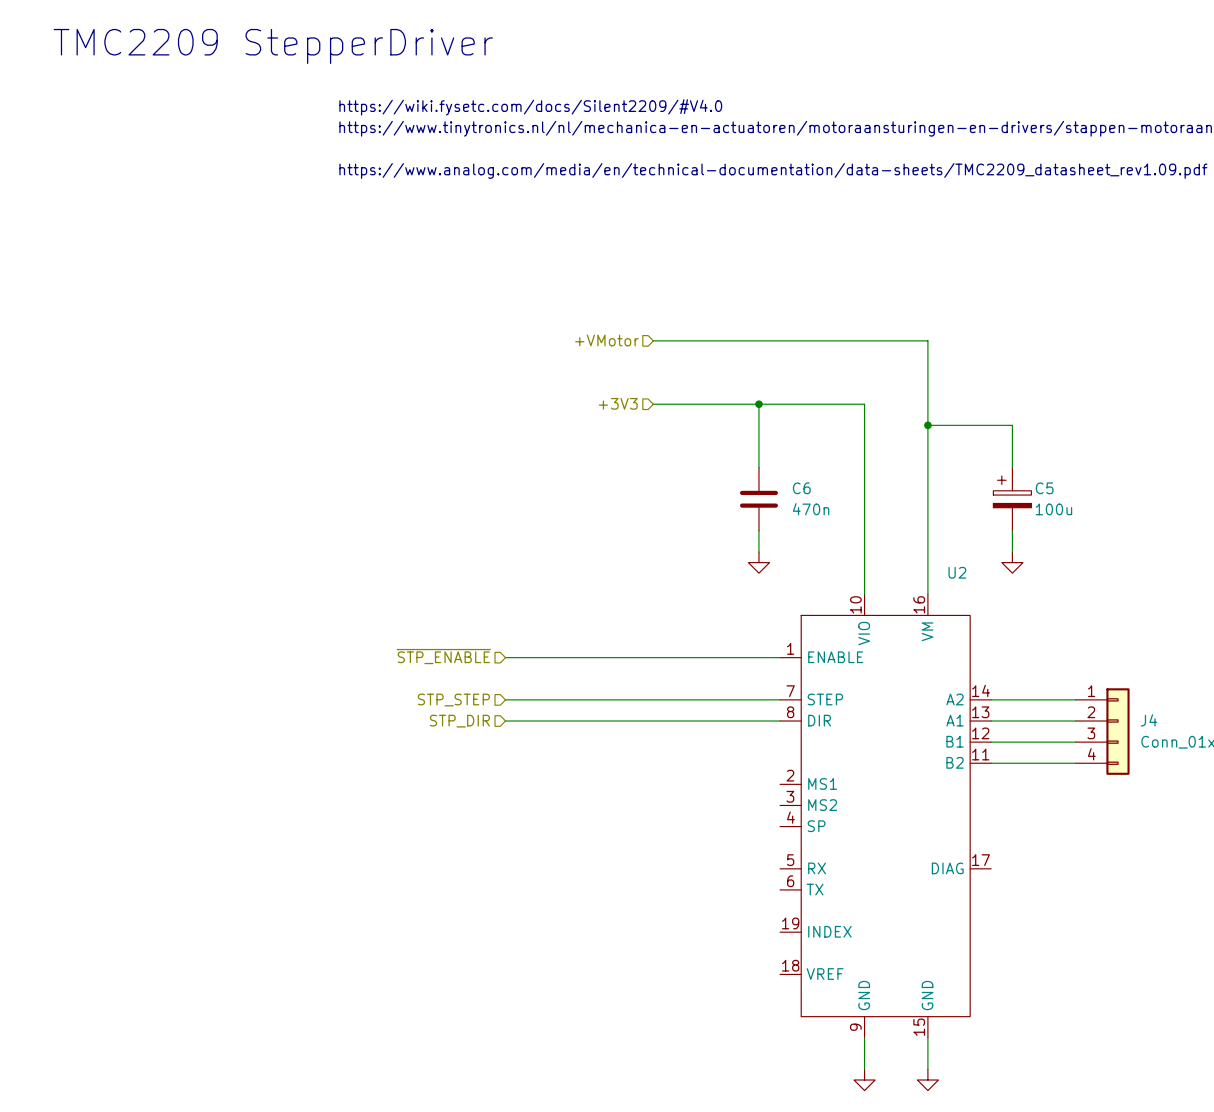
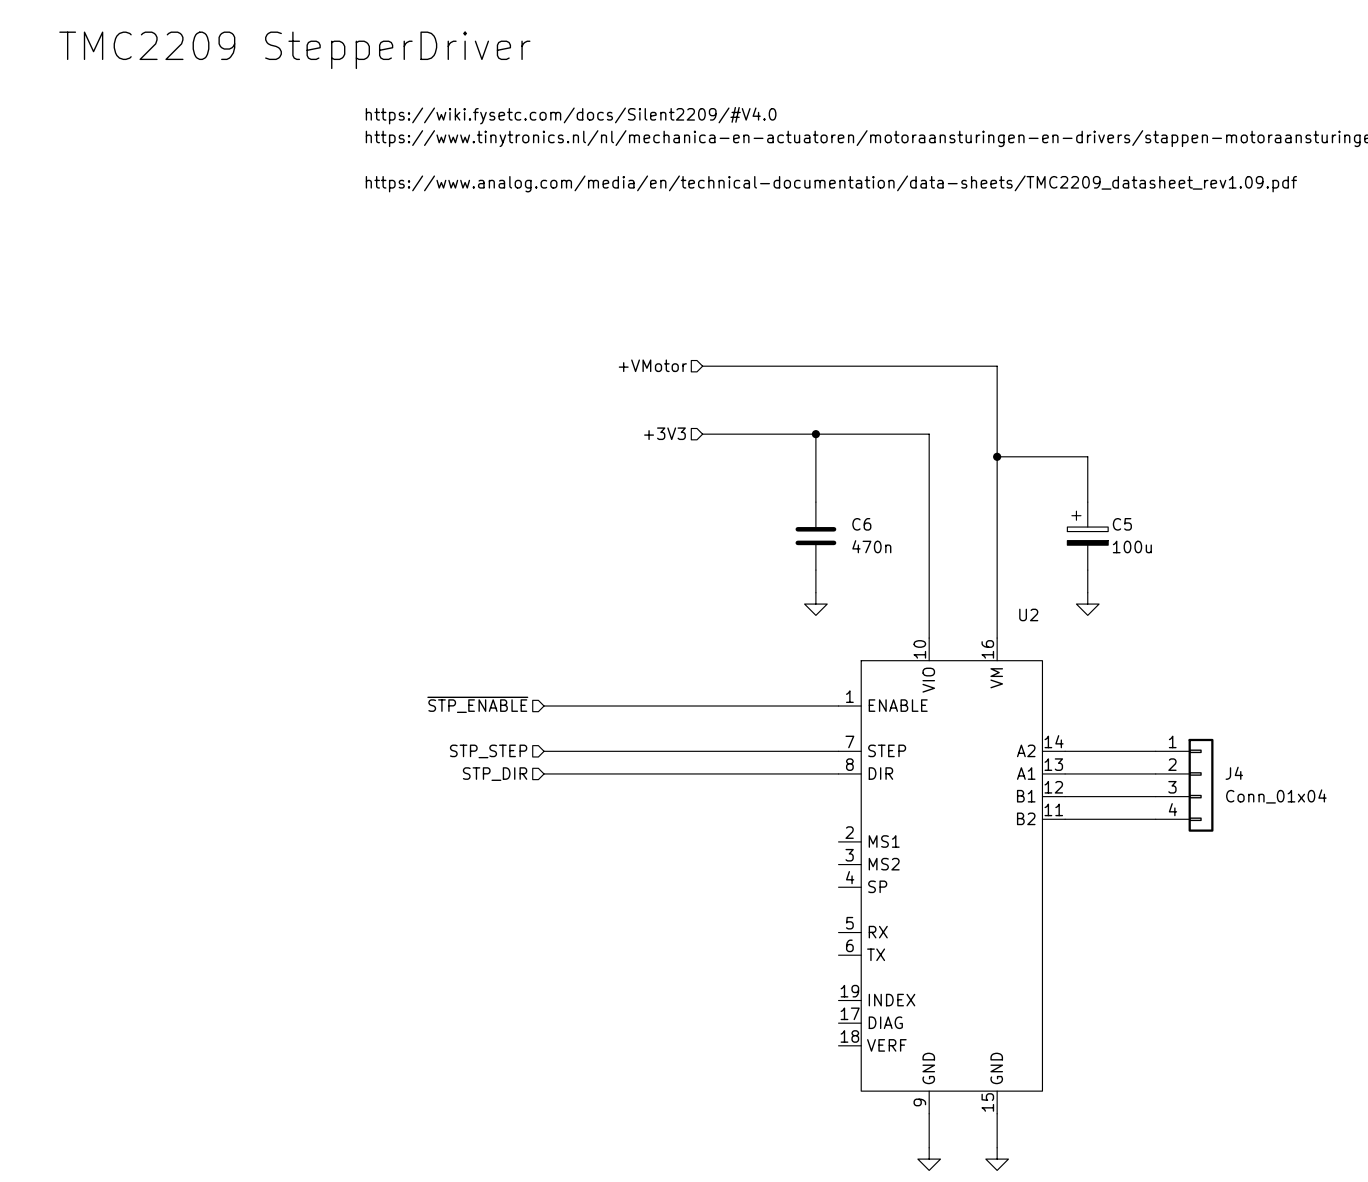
U2 symbol: [780, 594, 992, 1038] -> [838, 638, 1066, 1114]

